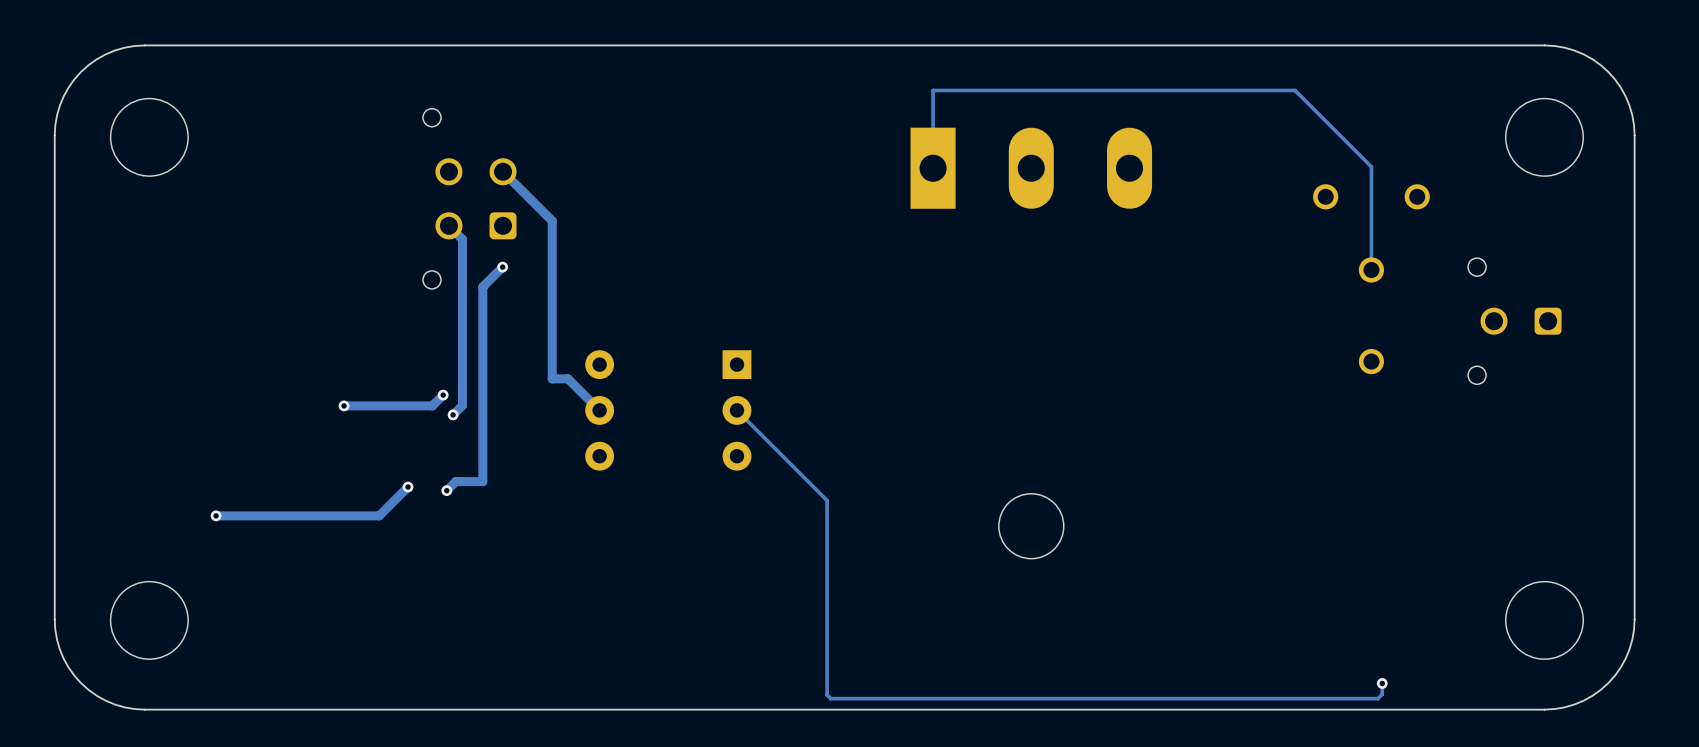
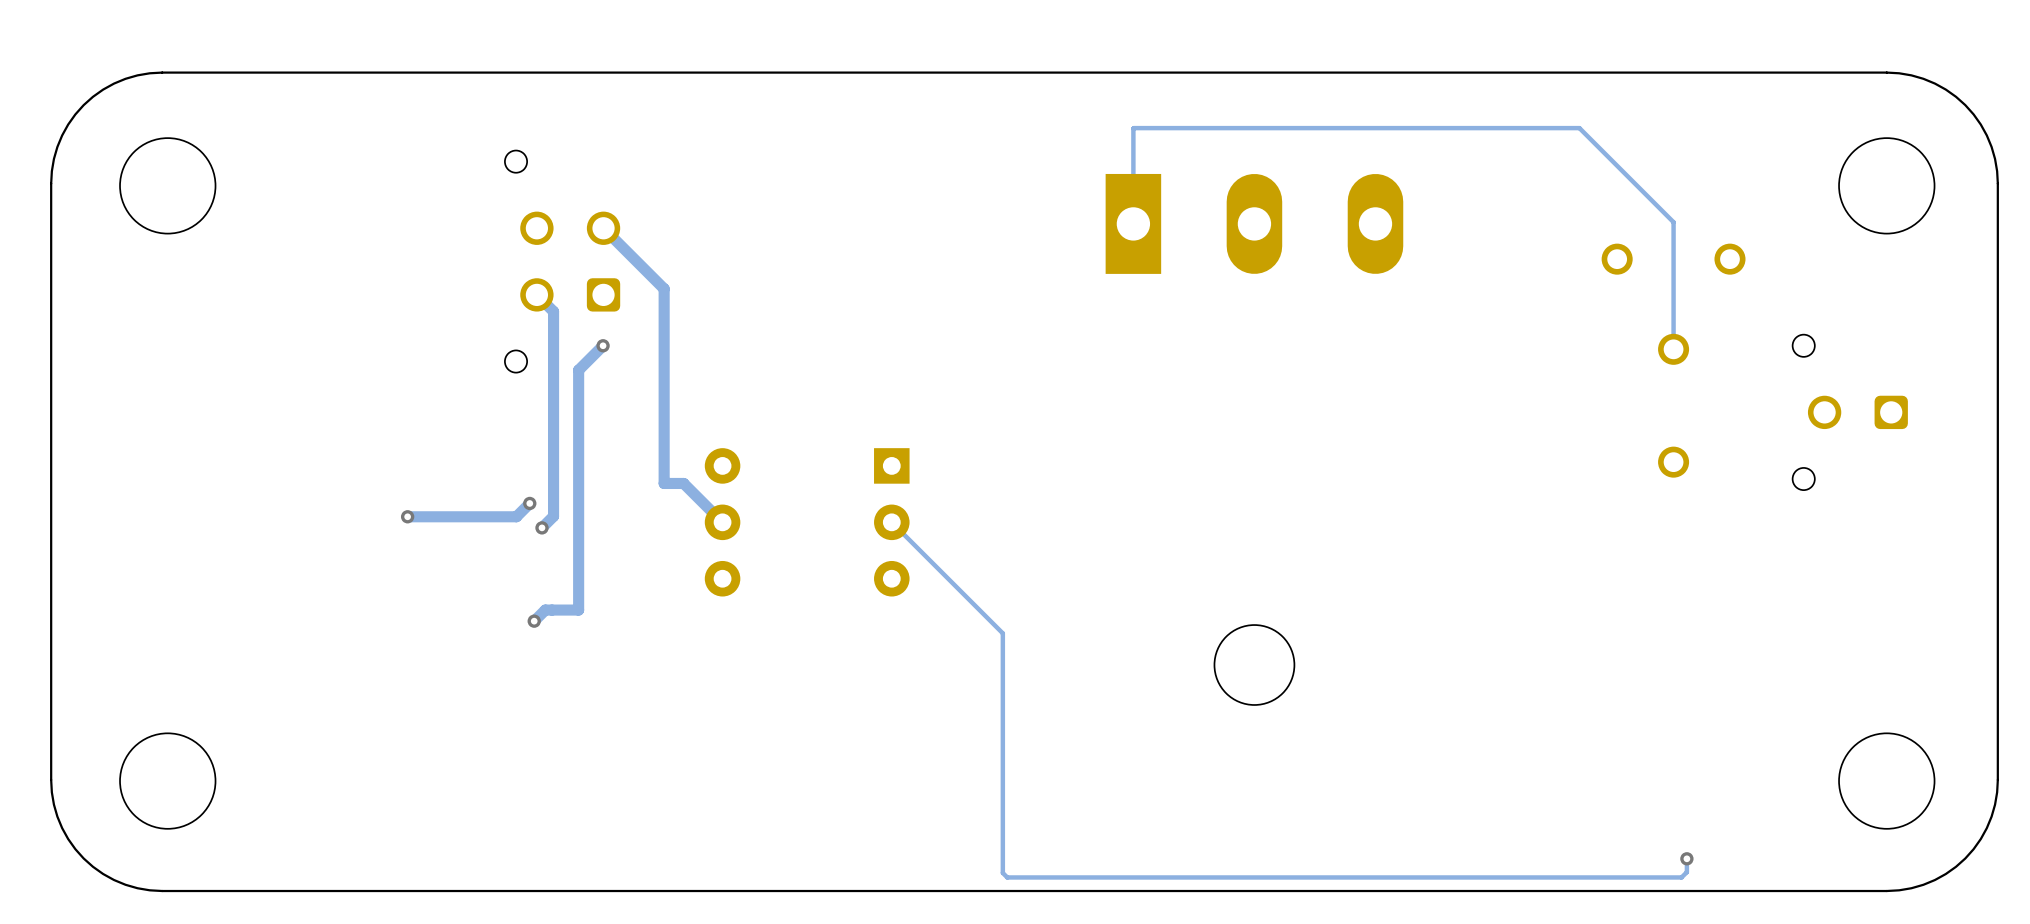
track: (408, 487) (379, 515) (216, 515) -> none
via: (408, 487) -> none
via: (216, 515) -> none

